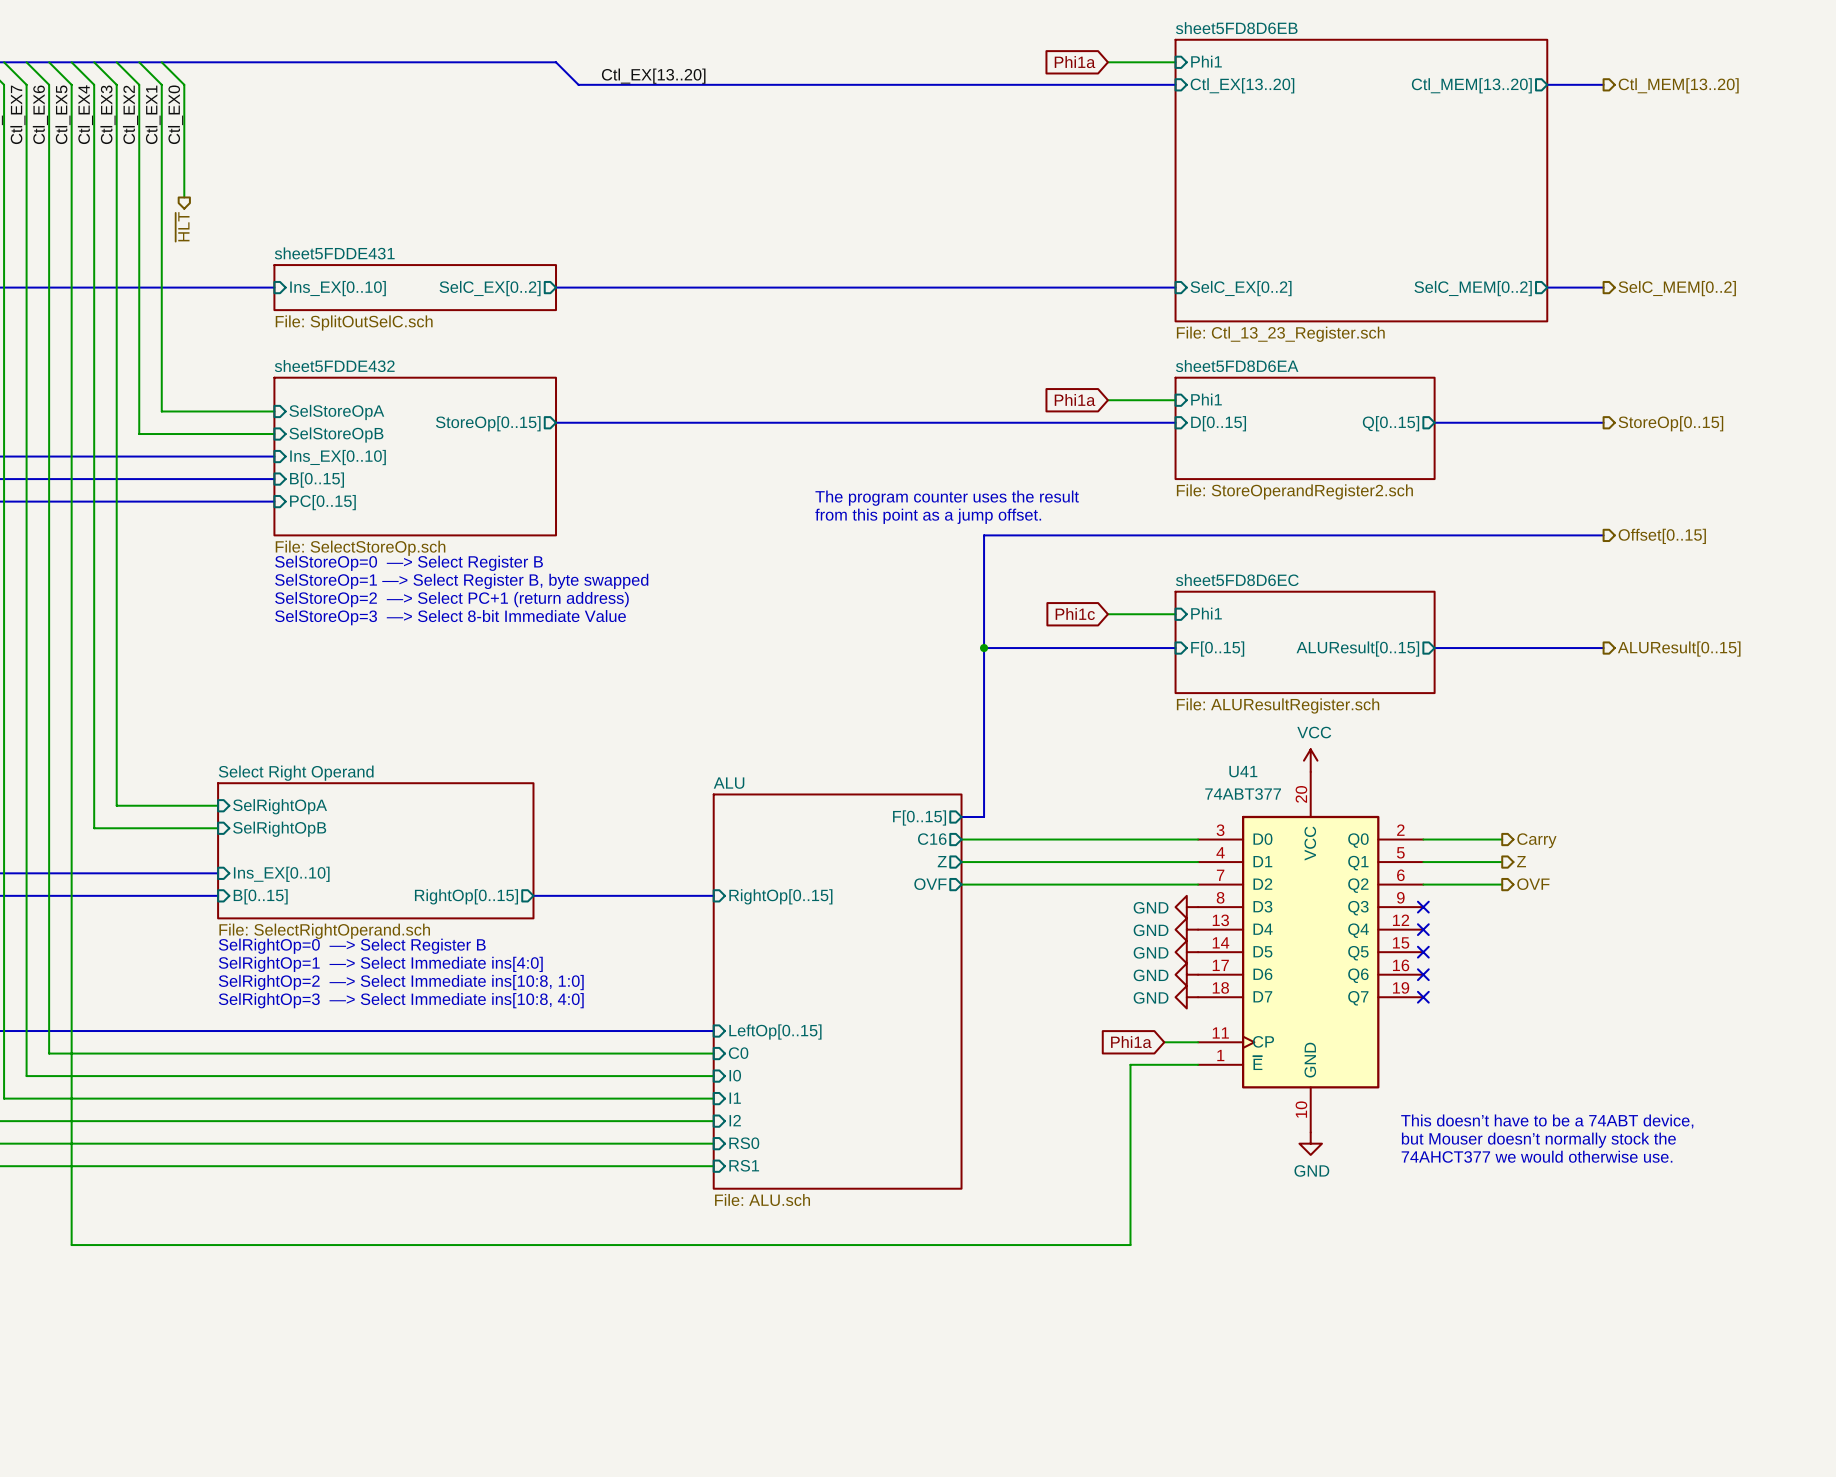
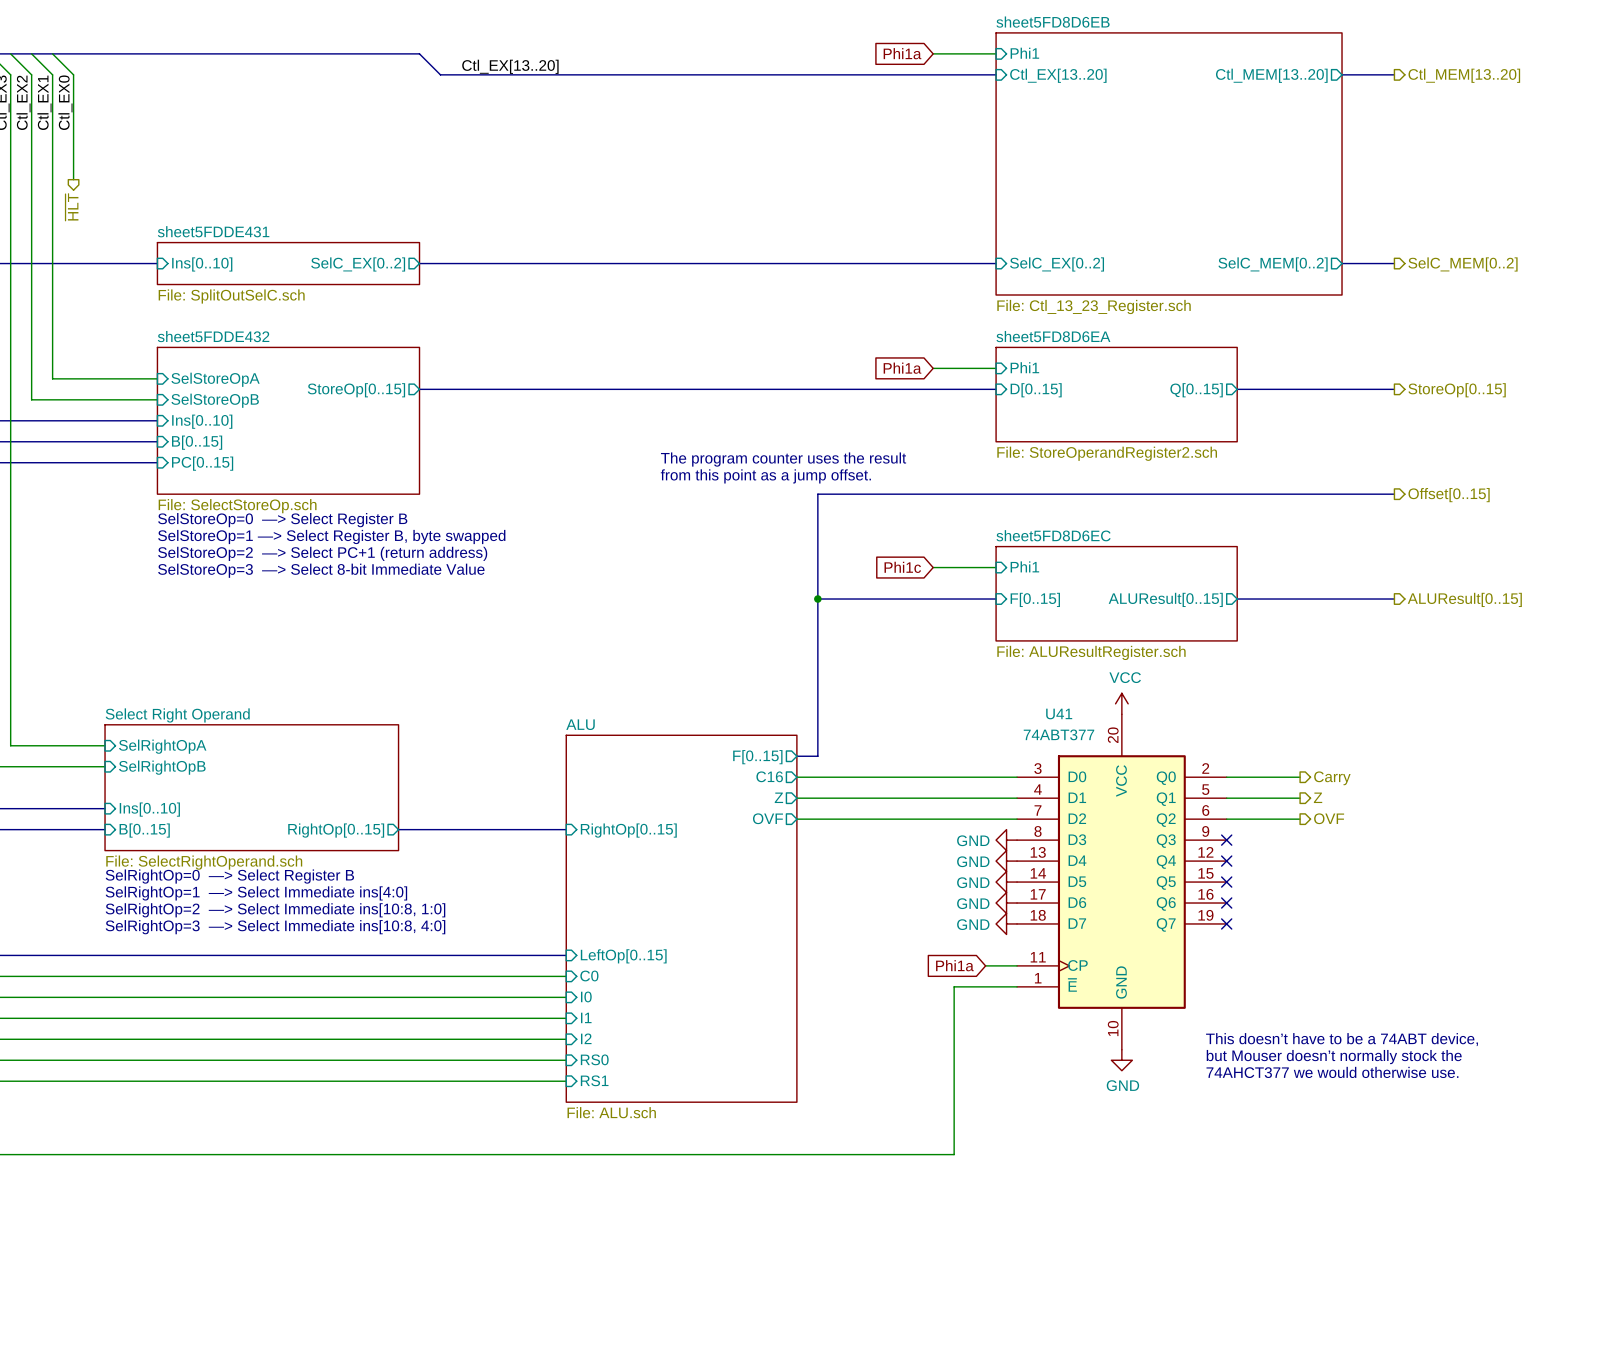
sheet pin: Ins_EX[0..10] (338, 288) -> Ins[0..10] (202, 264)
sheet pin: Ins_EX[0..10] (338, 457) -> Ins[0..10] (202, 421)
sheet pin: Ins_EX[0..10] (281, 874) -> Ins[0..10] (149, 809)

